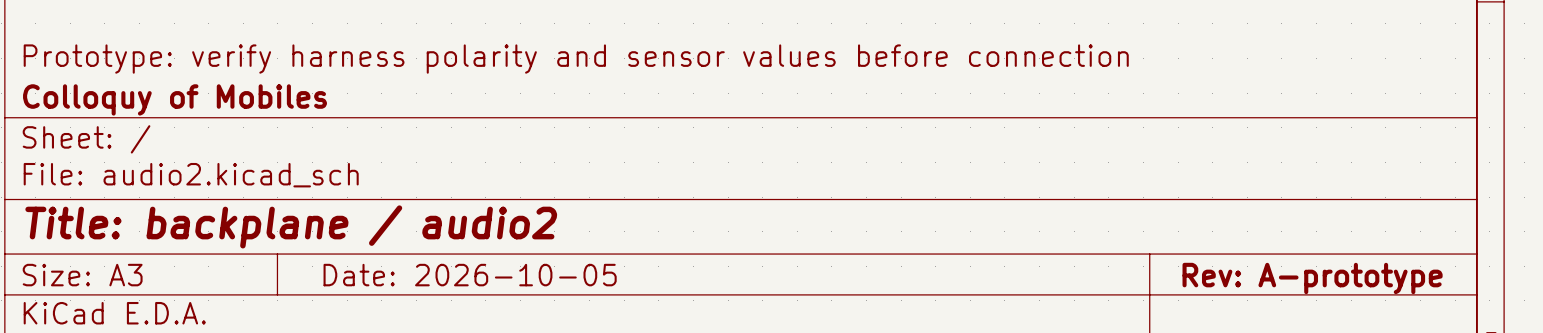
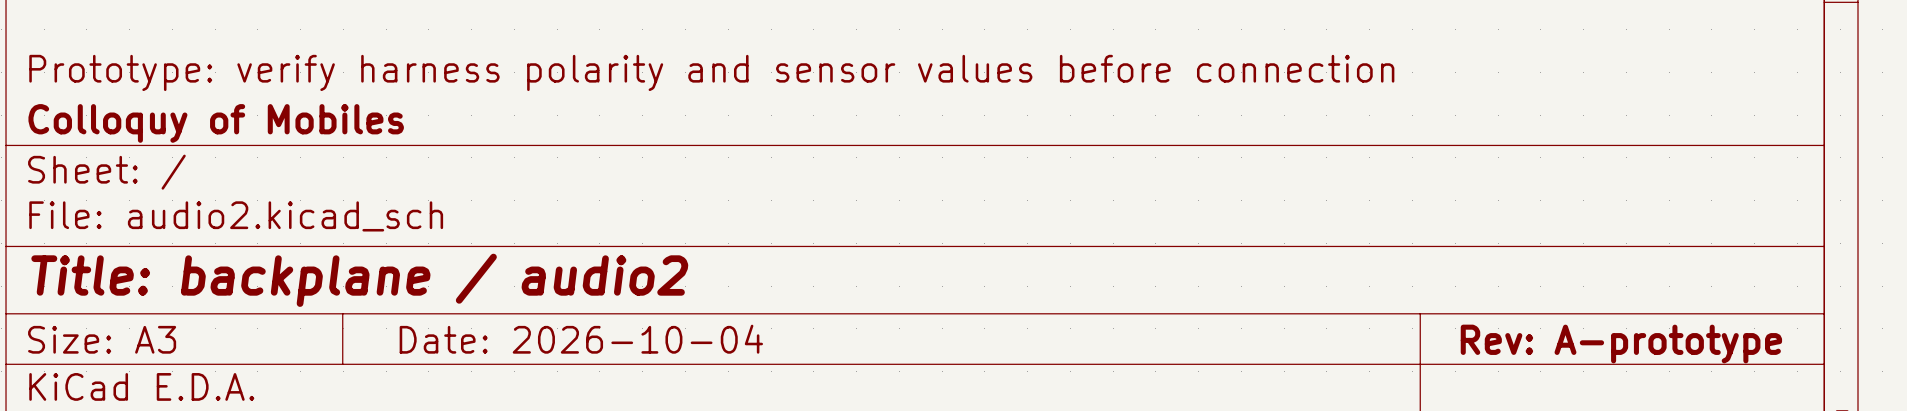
title block: Date: 2026-10-05 (470, 275) -> Date: 2026-10-04 (581, 339)

